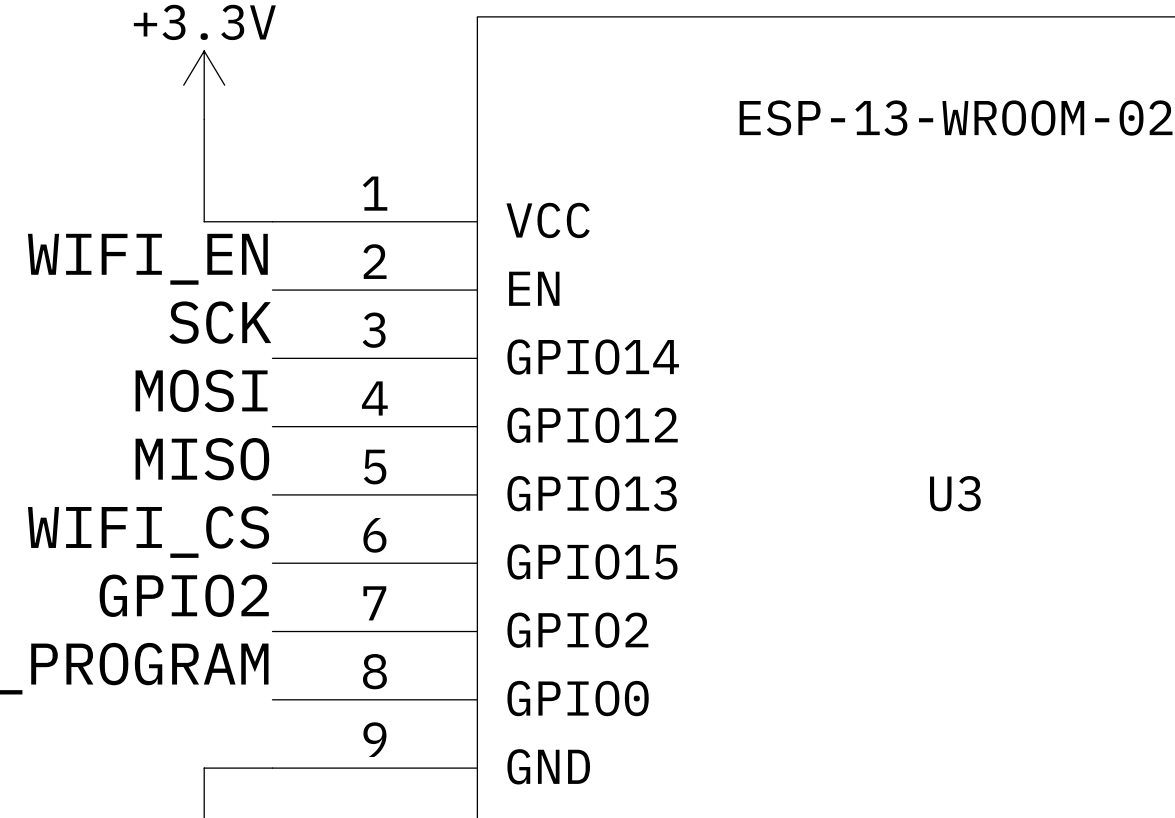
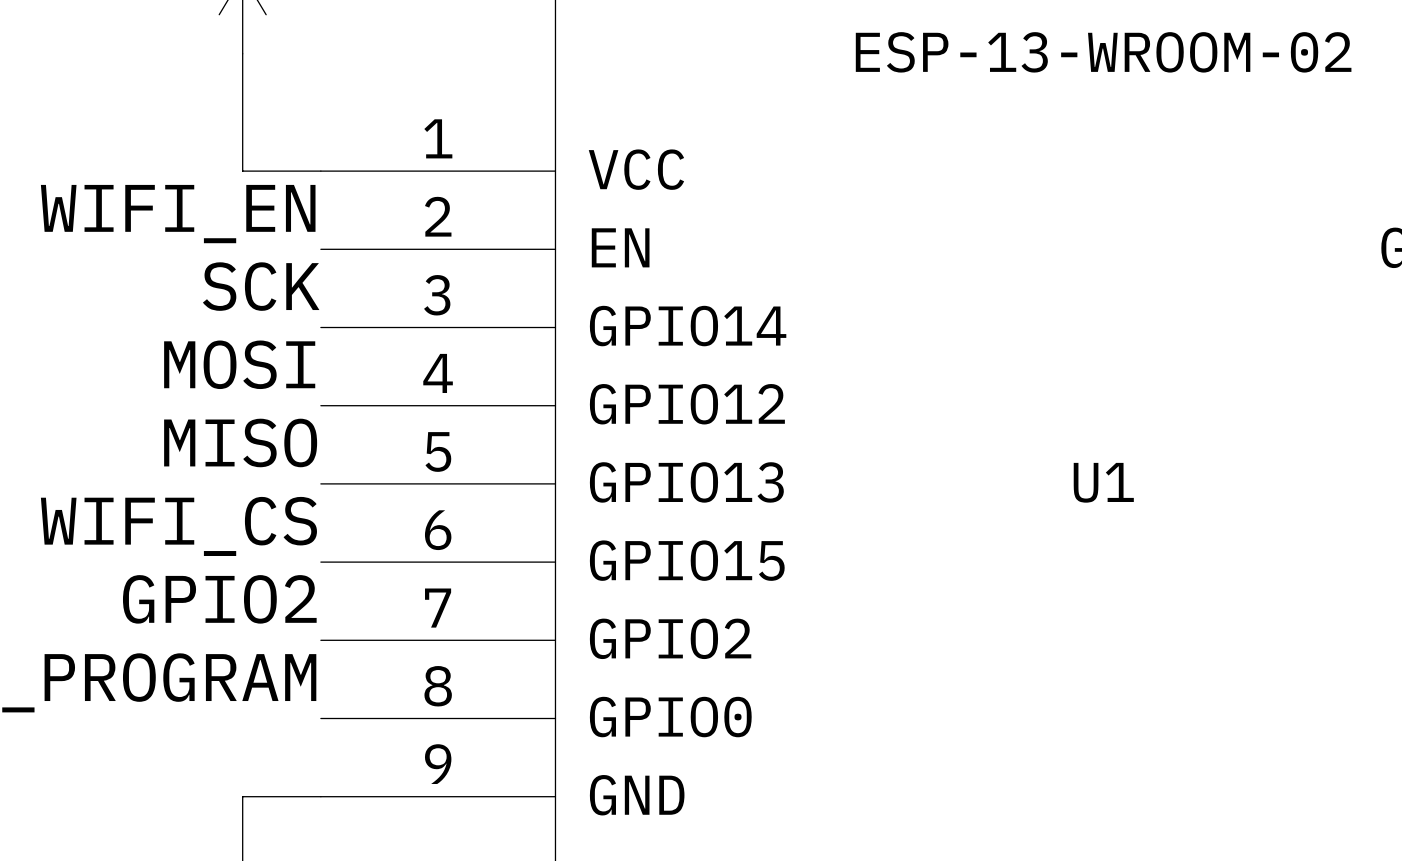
U3 name: U3 (955, 493) -> U1 (1103, 482)

